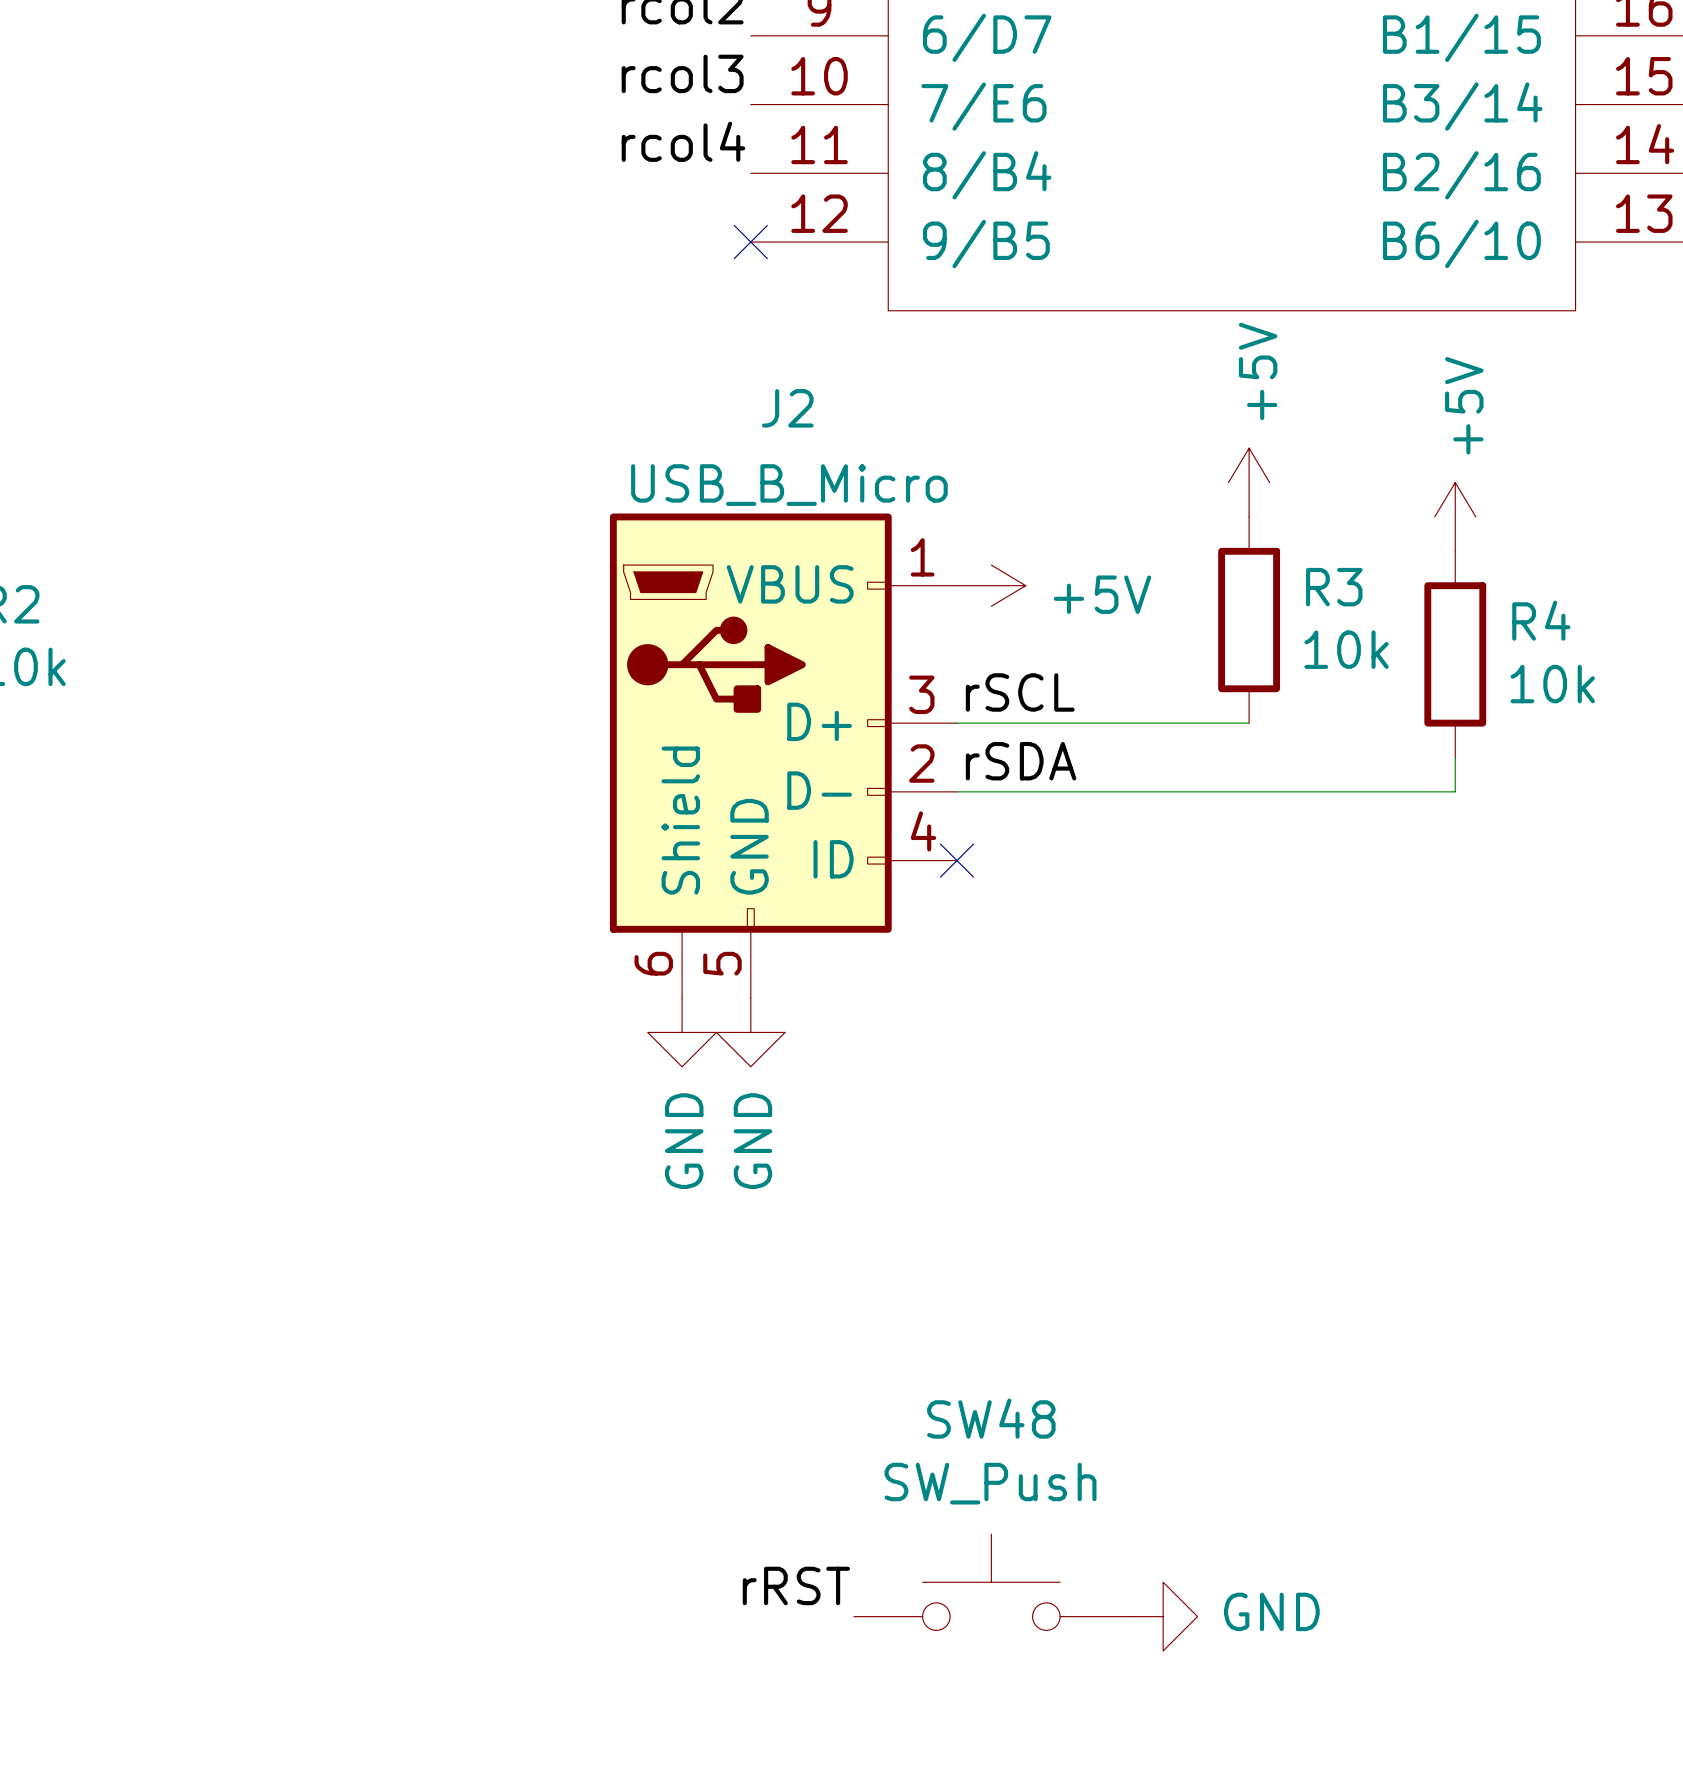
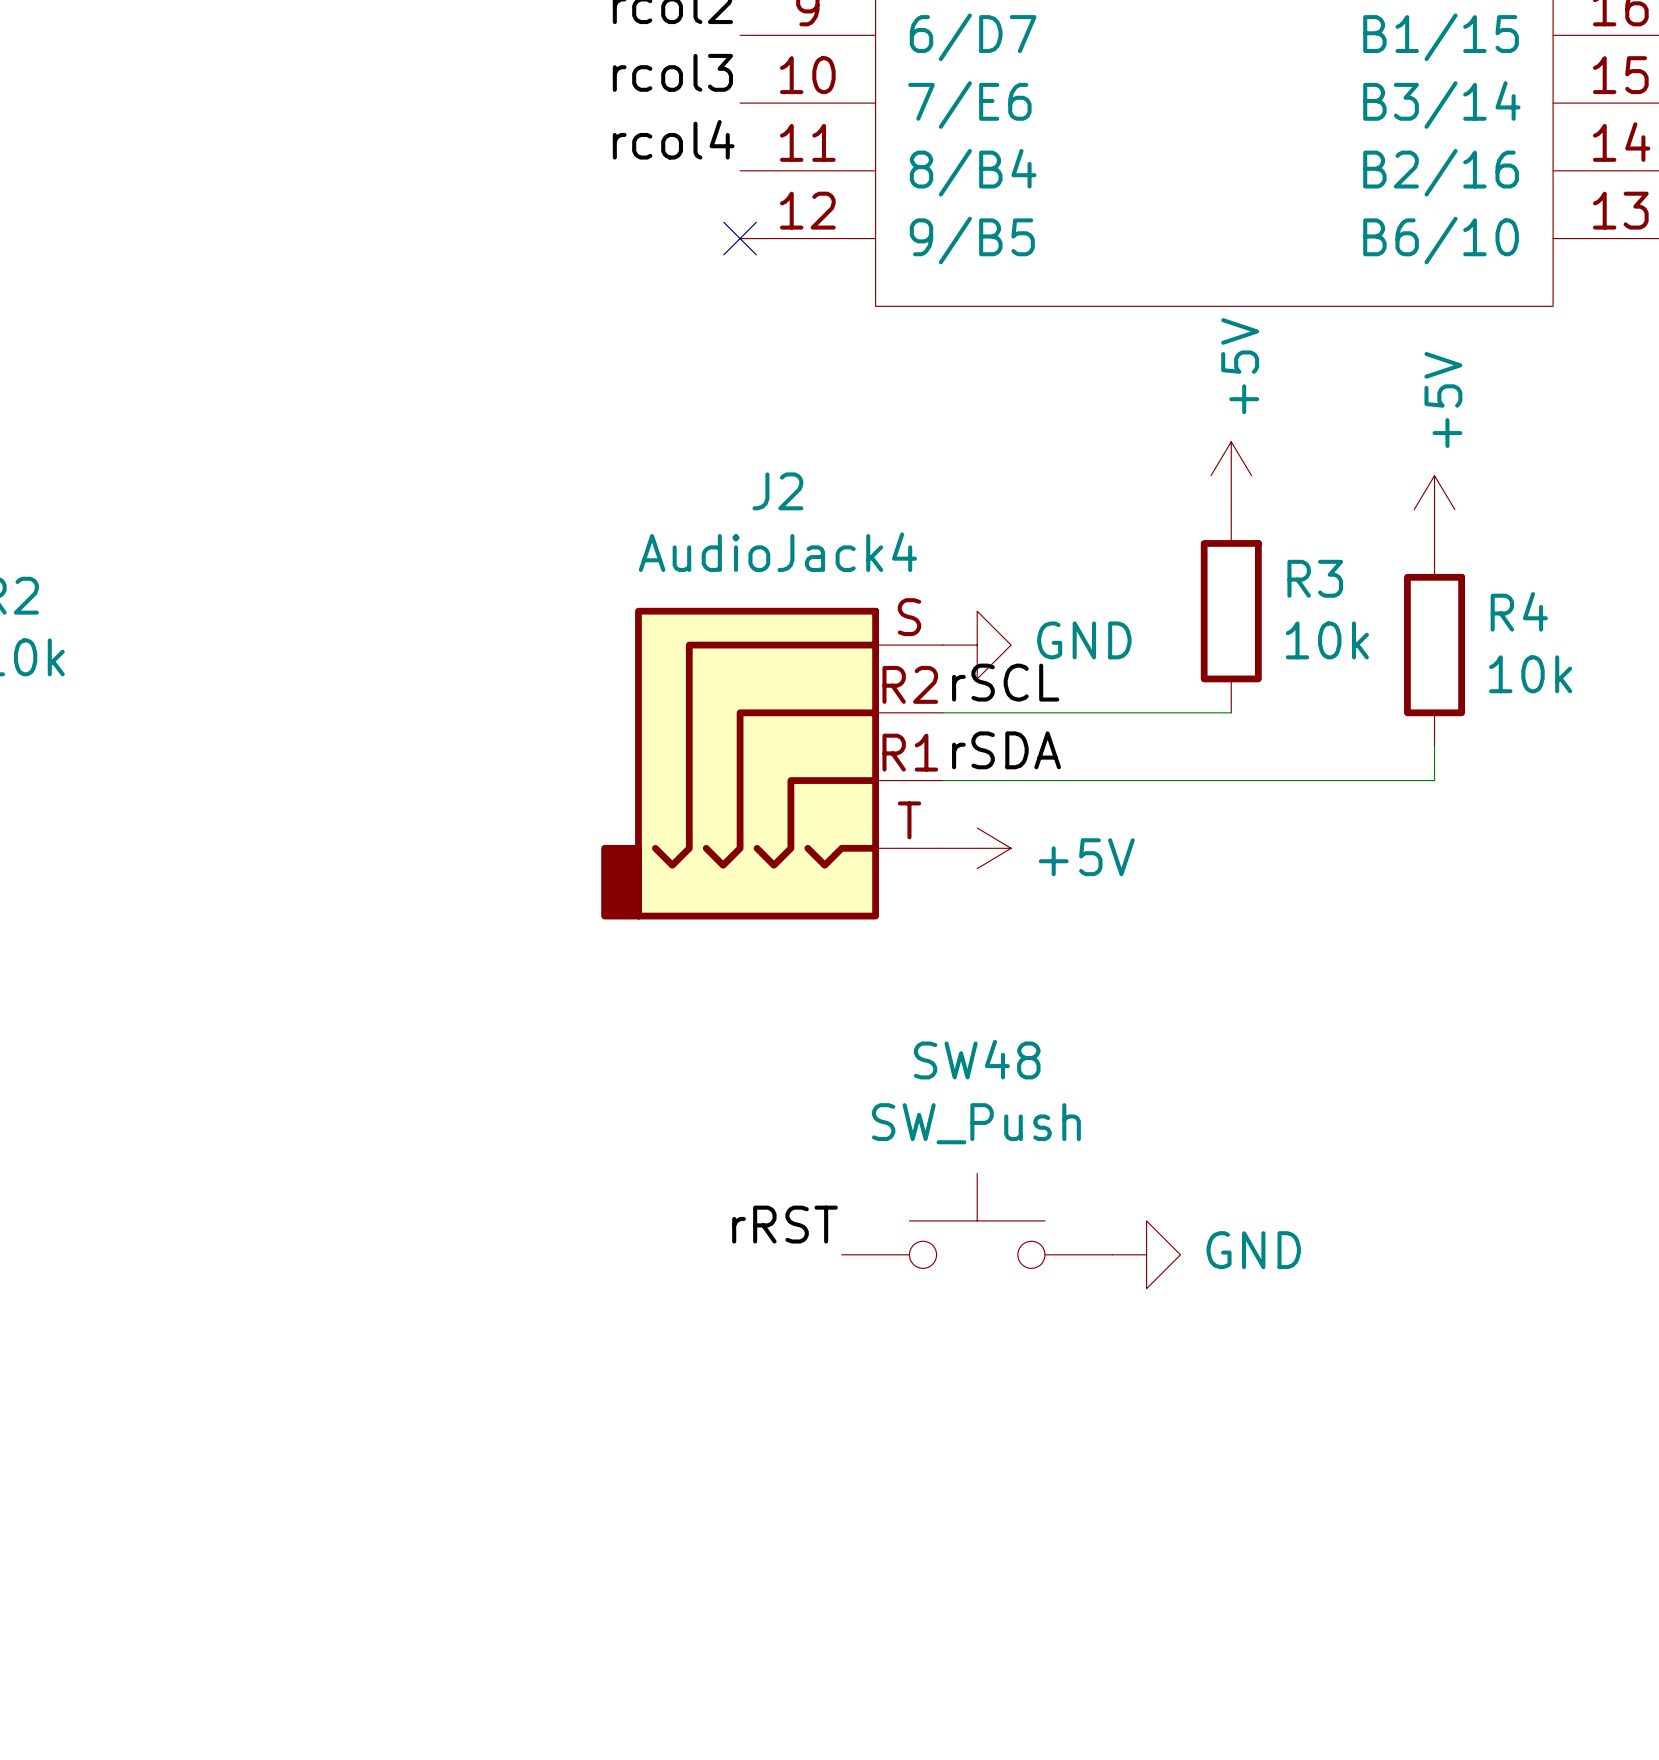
J2 name position: J2 (787, 408) -> J2 (777, 491)
J2 value: USB_B_Micro (789, 485) -> AudioJack4 (777, 552)
J2 symbol: [609, 513, 957, 999] -> [601, 607, 944, 920]
power symbol position: +5V (991, 585) -> +5V (977, 848)
power symbol: none -> GND (977, 645)
no-connect mark: (956, 860) -> none
power symbol: GND (682, 1032) -> none
power symbol: GND (750, 1032) -> none
power symbol: none -> GND (1146, 1254)
SW48 position: (991, 1582) -> (977, 1220)
label position: rRST (796, 1585) -> rRST (785, 1224)
power symbol: GND (1163, 1616) -> none

